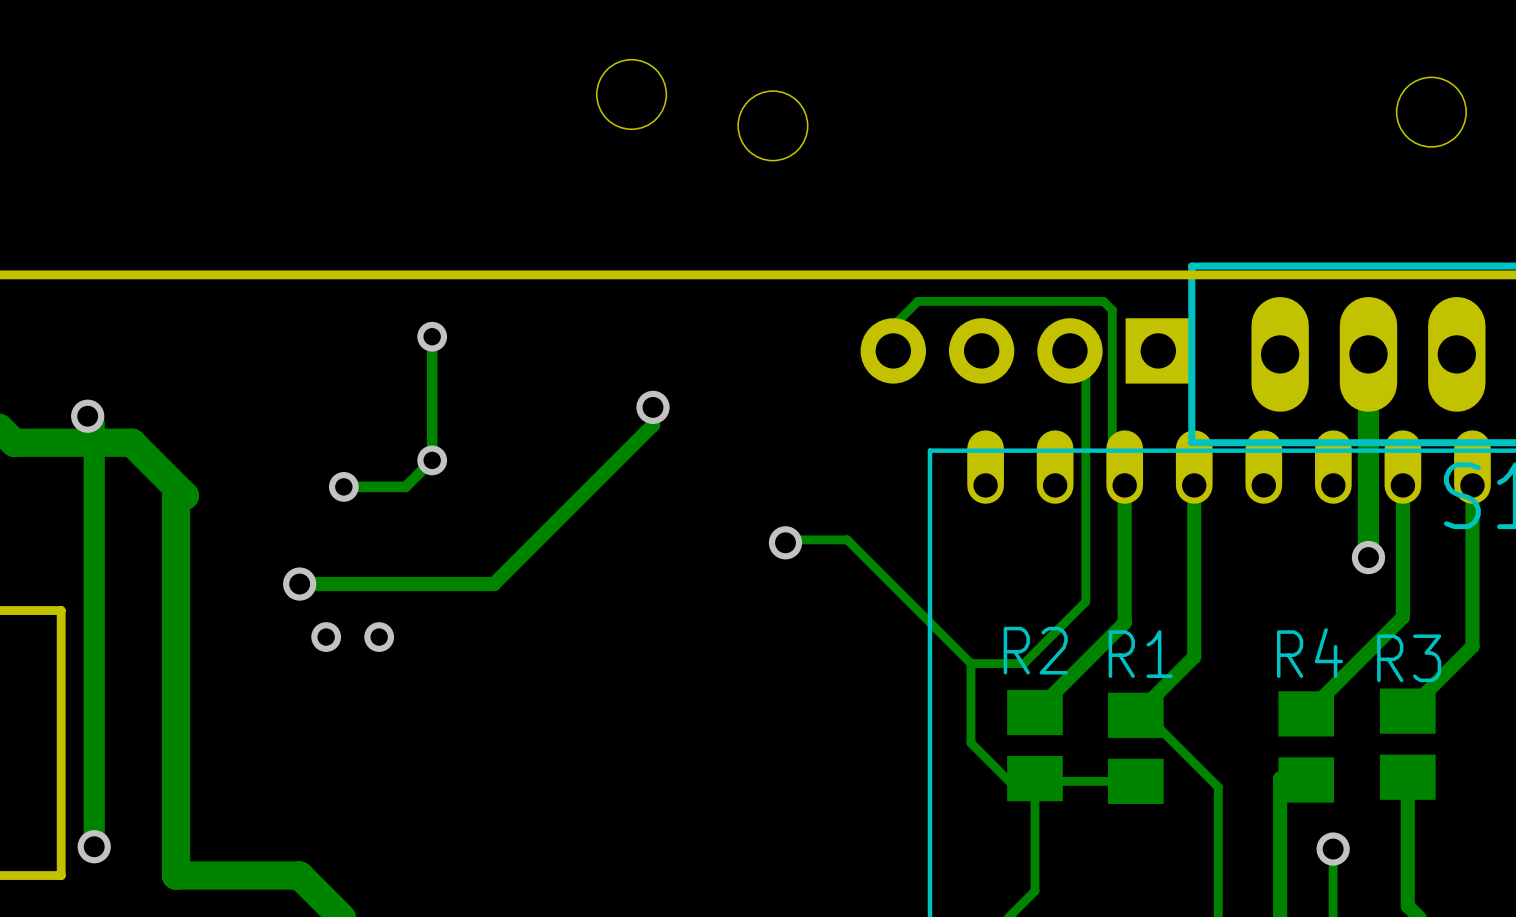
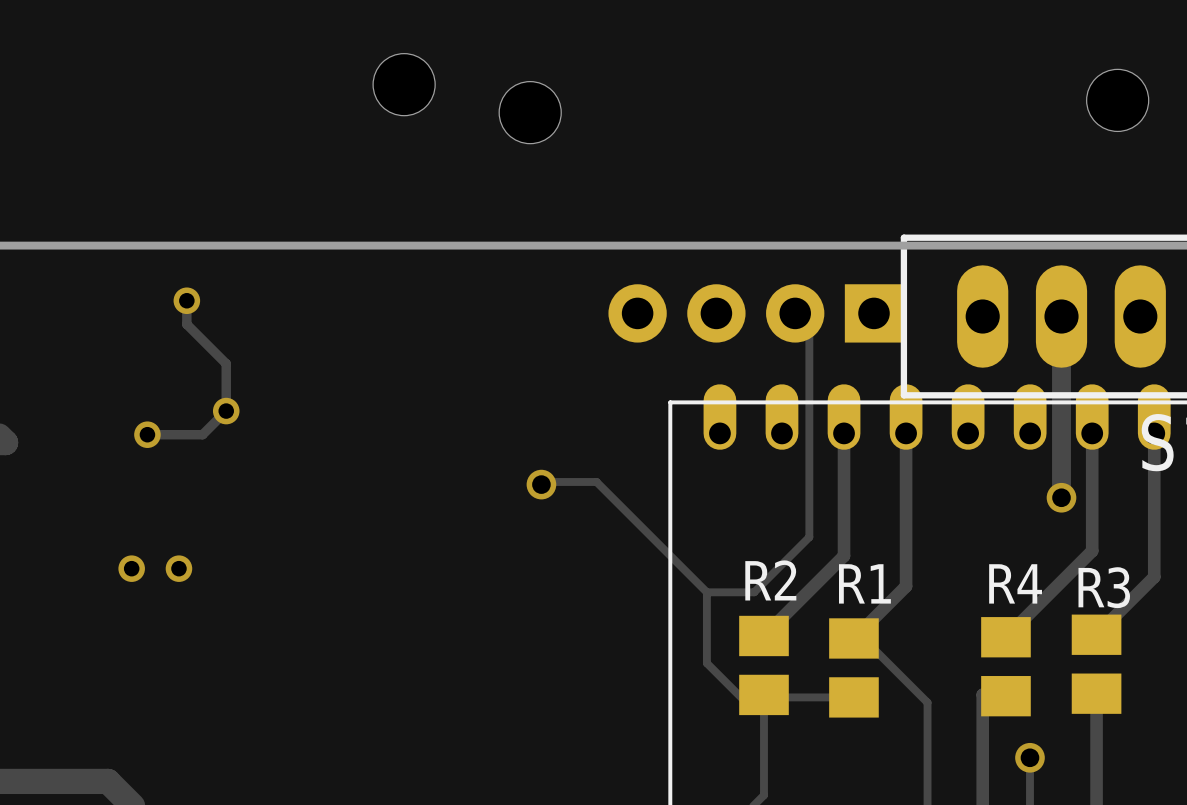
track: (432, 336) (432, 407) -> (186, 300) (186, 324) (226, 363)
via position: (432, 336) -> (186, 300)
track: (893, 350) (893, 326) (917, 301) (1103, 301) (1112, 310) (1112, 473) (1124, 485) -> none
track: (653, 407) (653, 425) (494, 584) (299, 584) -> none
via: (653, 407) -> none
via: (299, 584) -> none

